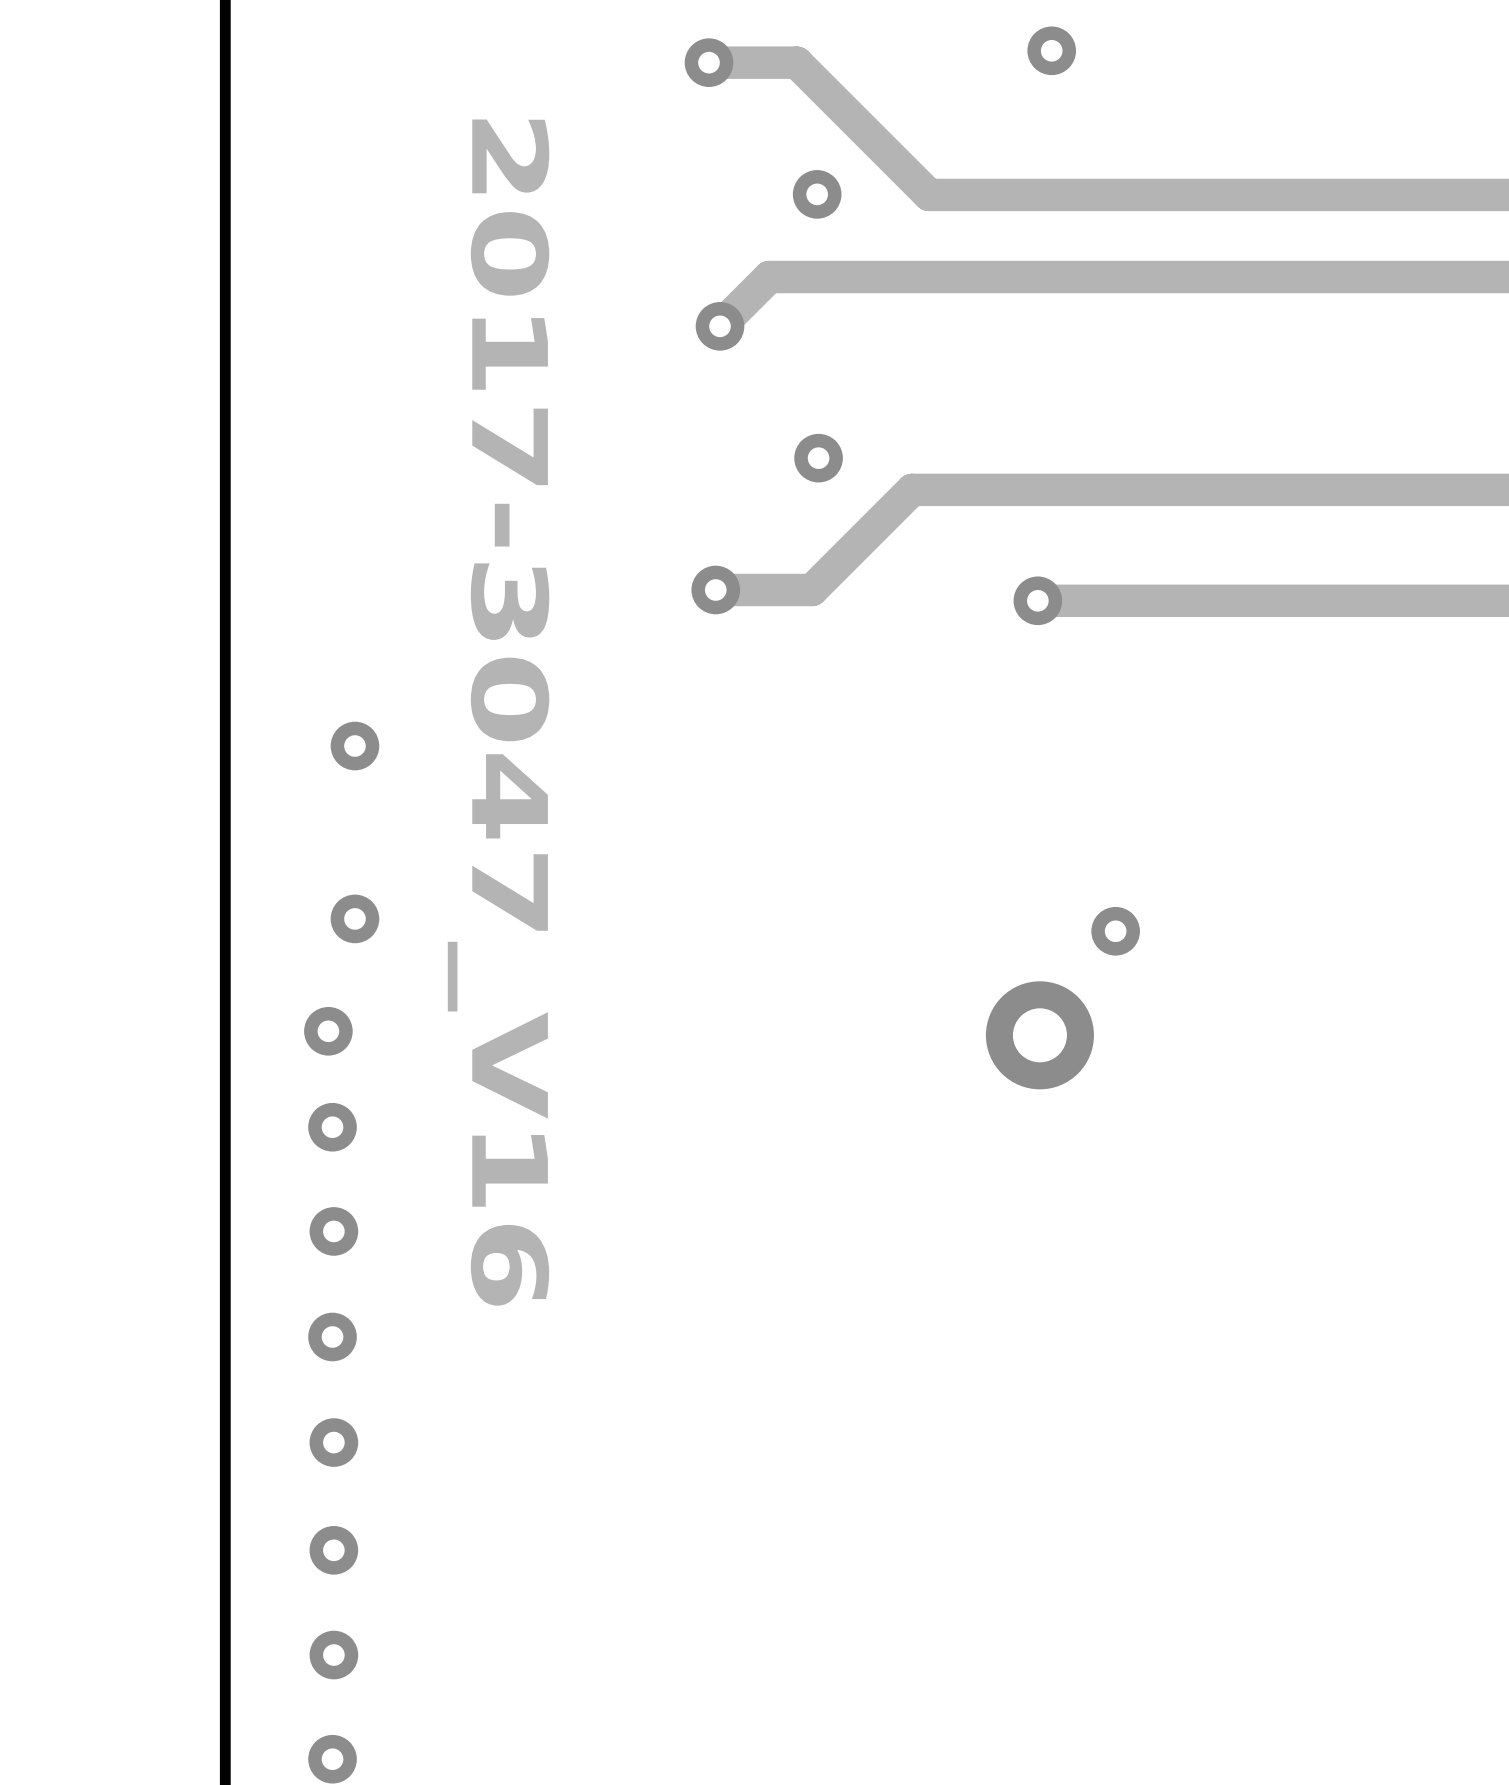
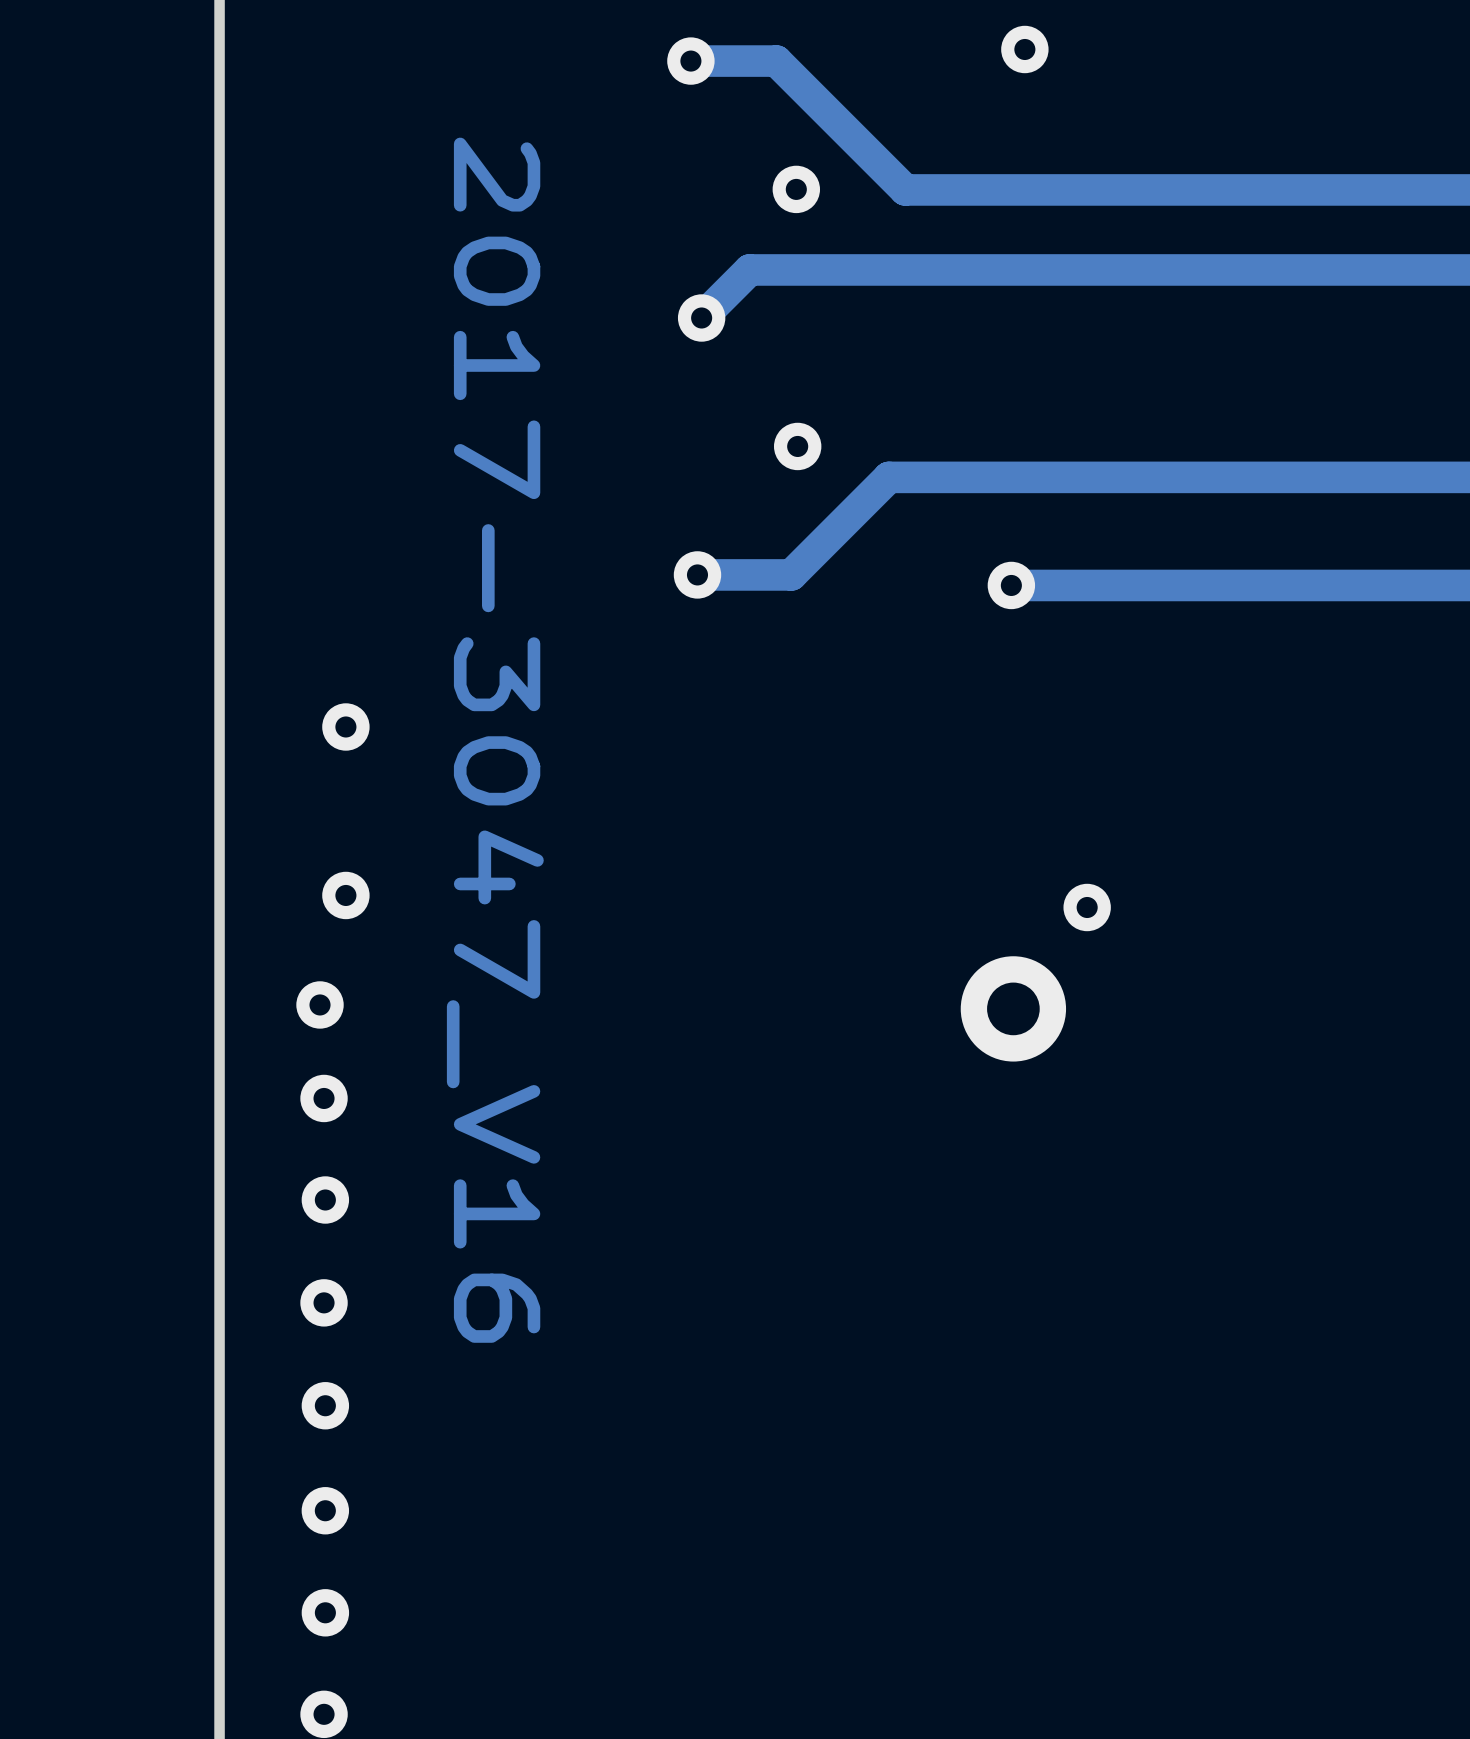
text position: 2017-3047_V16 (498, 712) -> 2017-3047_V16 (495, 740)

